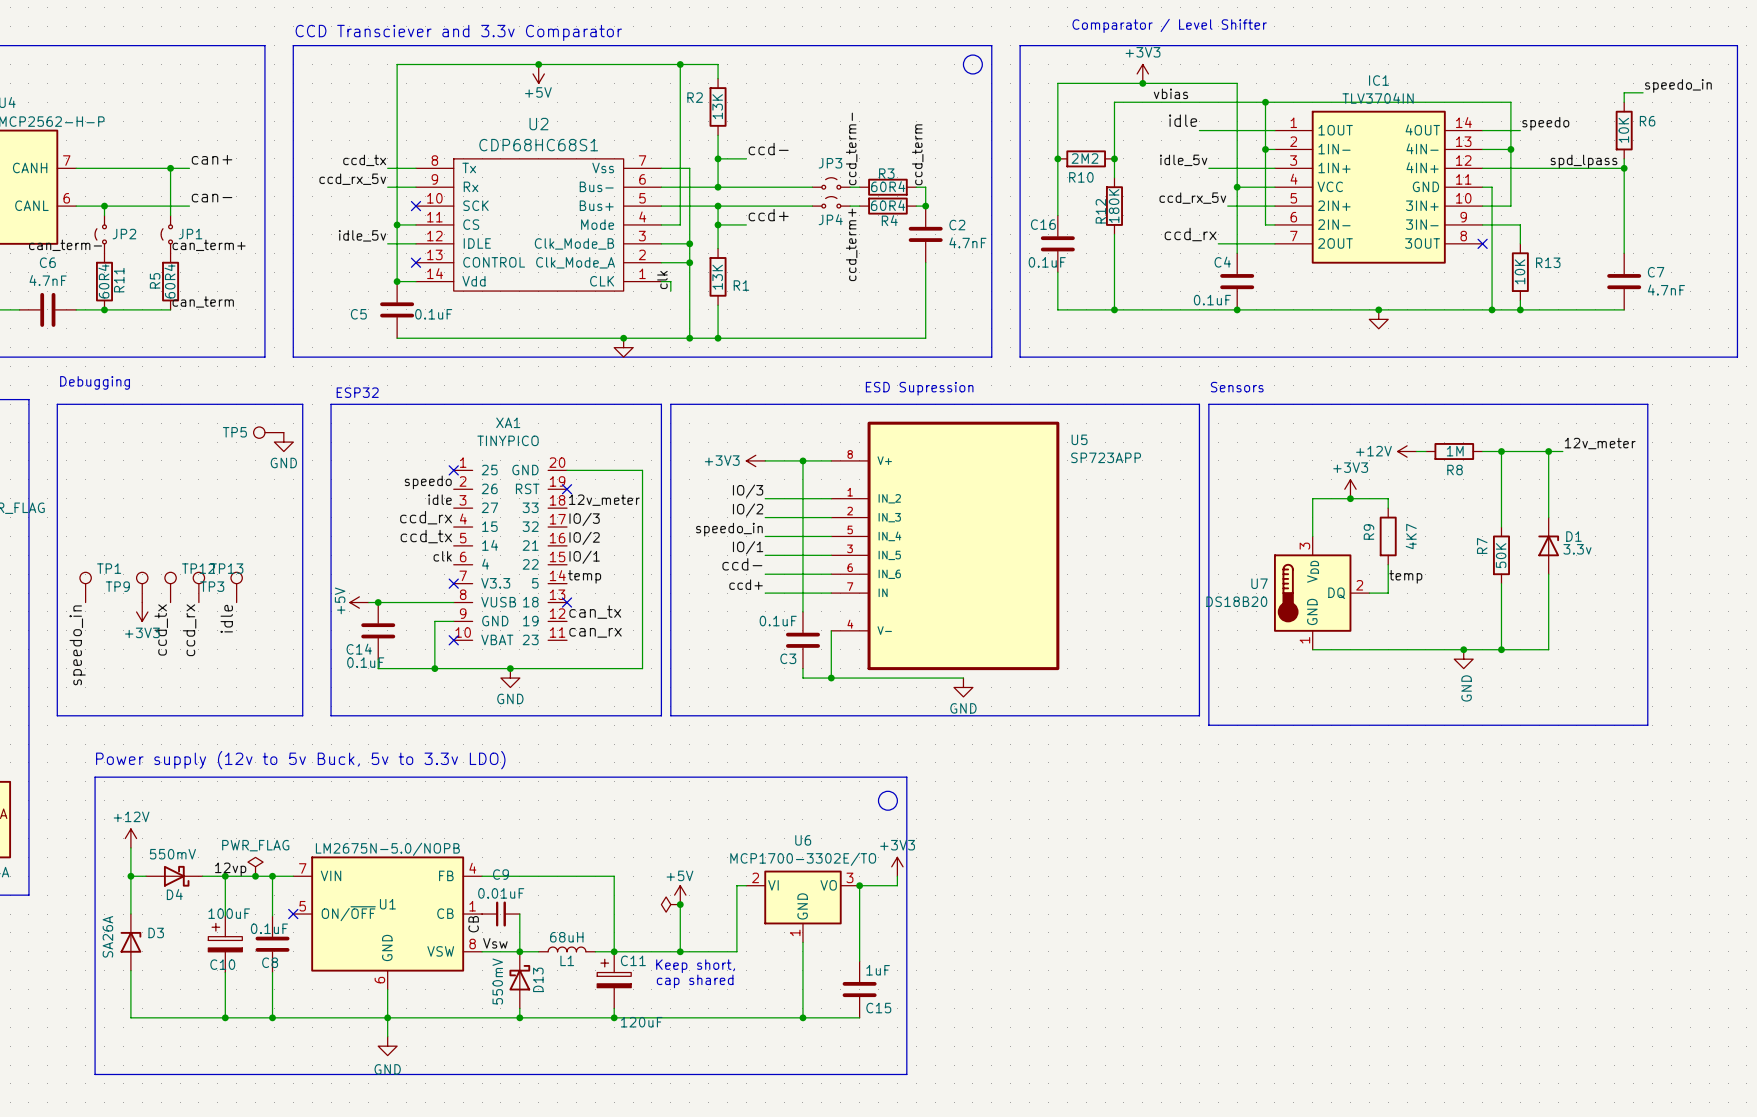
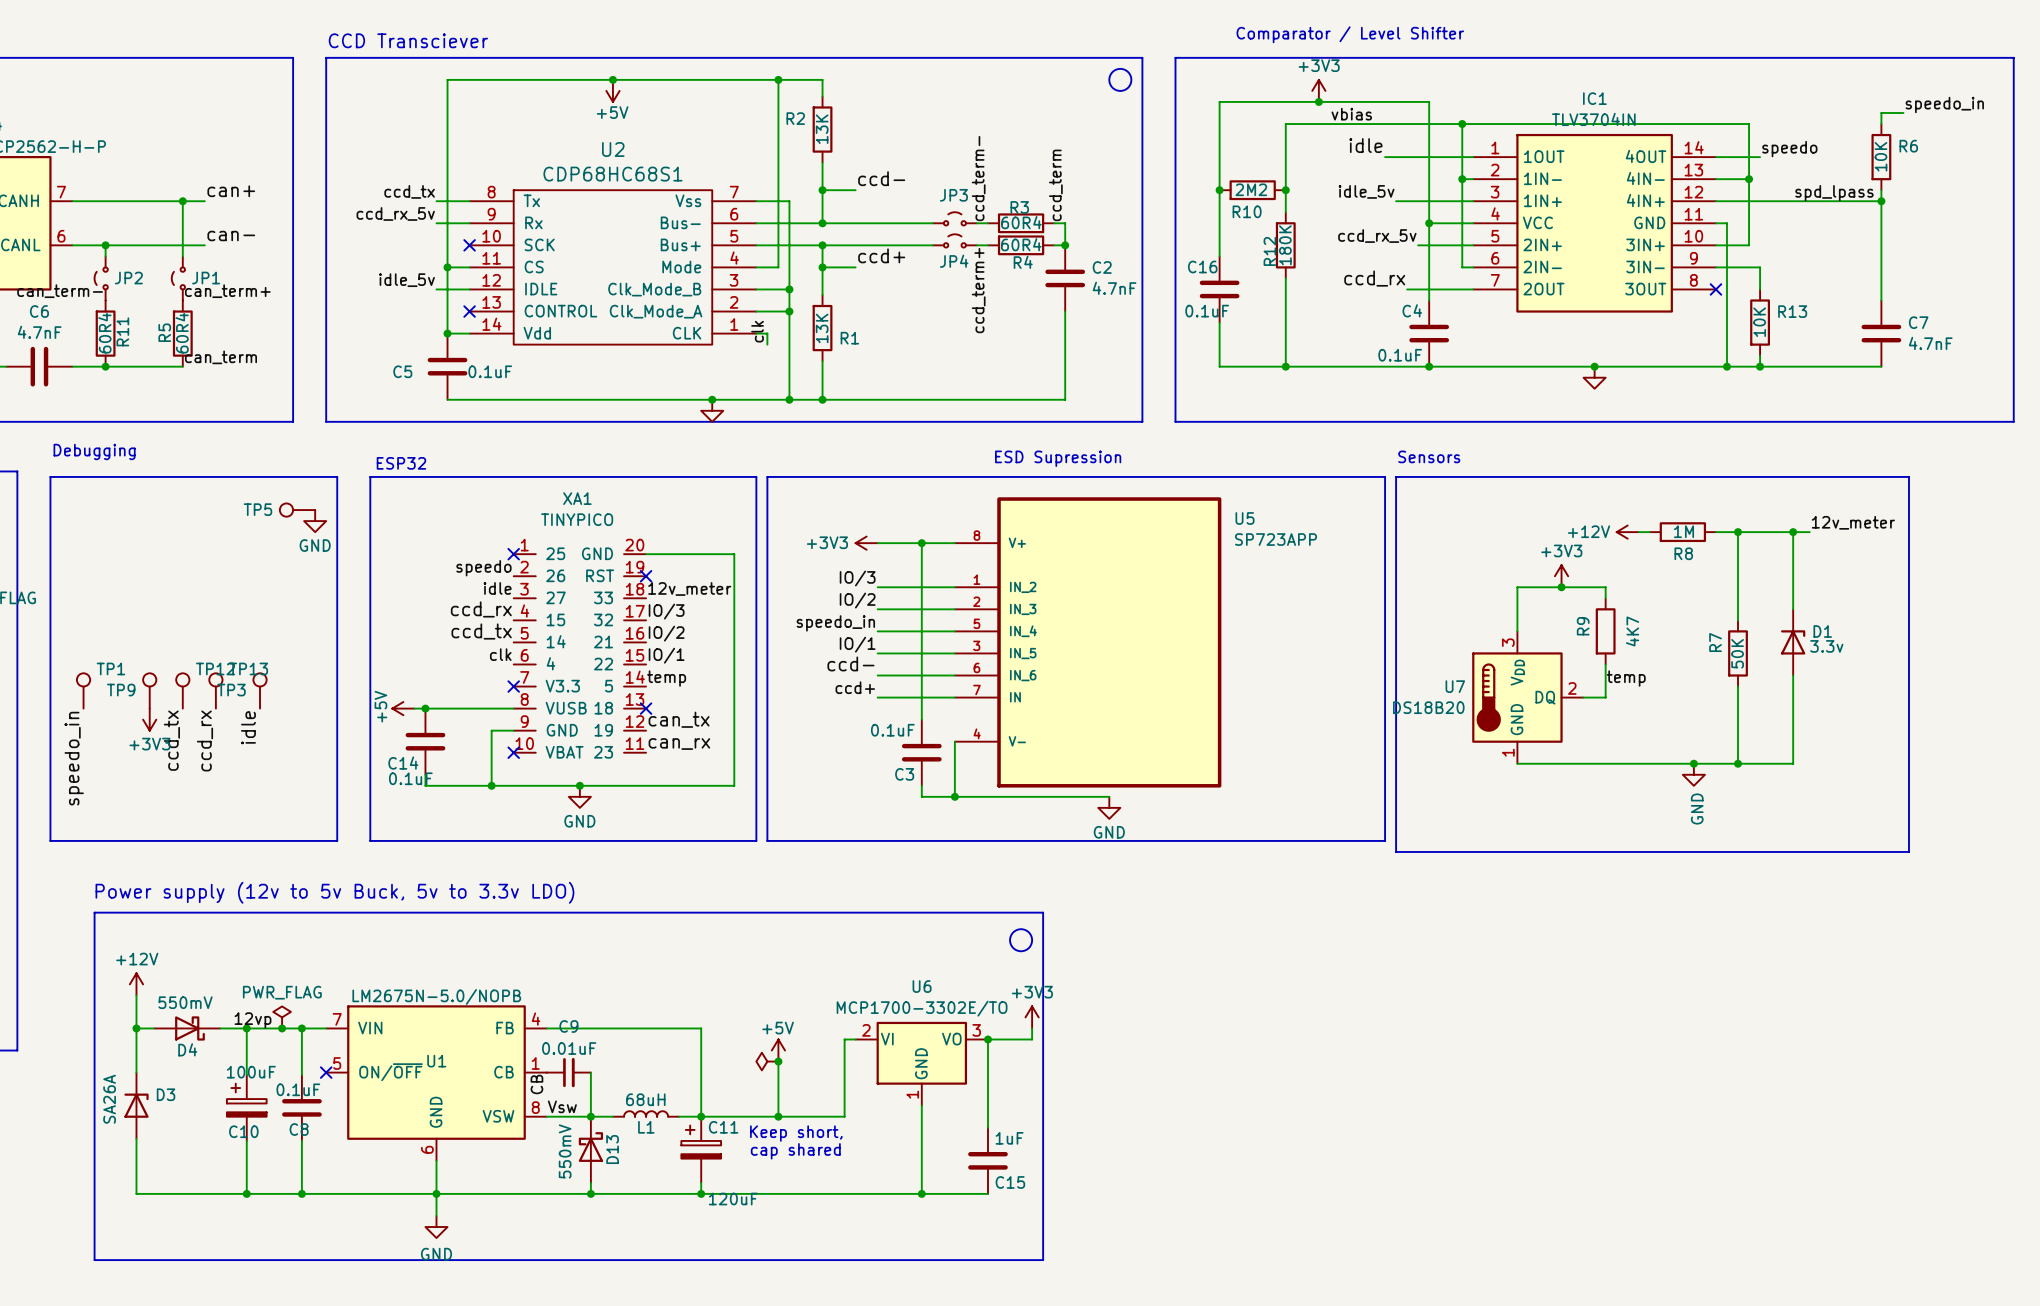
text: CCD Transciever and 3.3v Comparator (458, 32) -> CCD Transciever (408, 40)

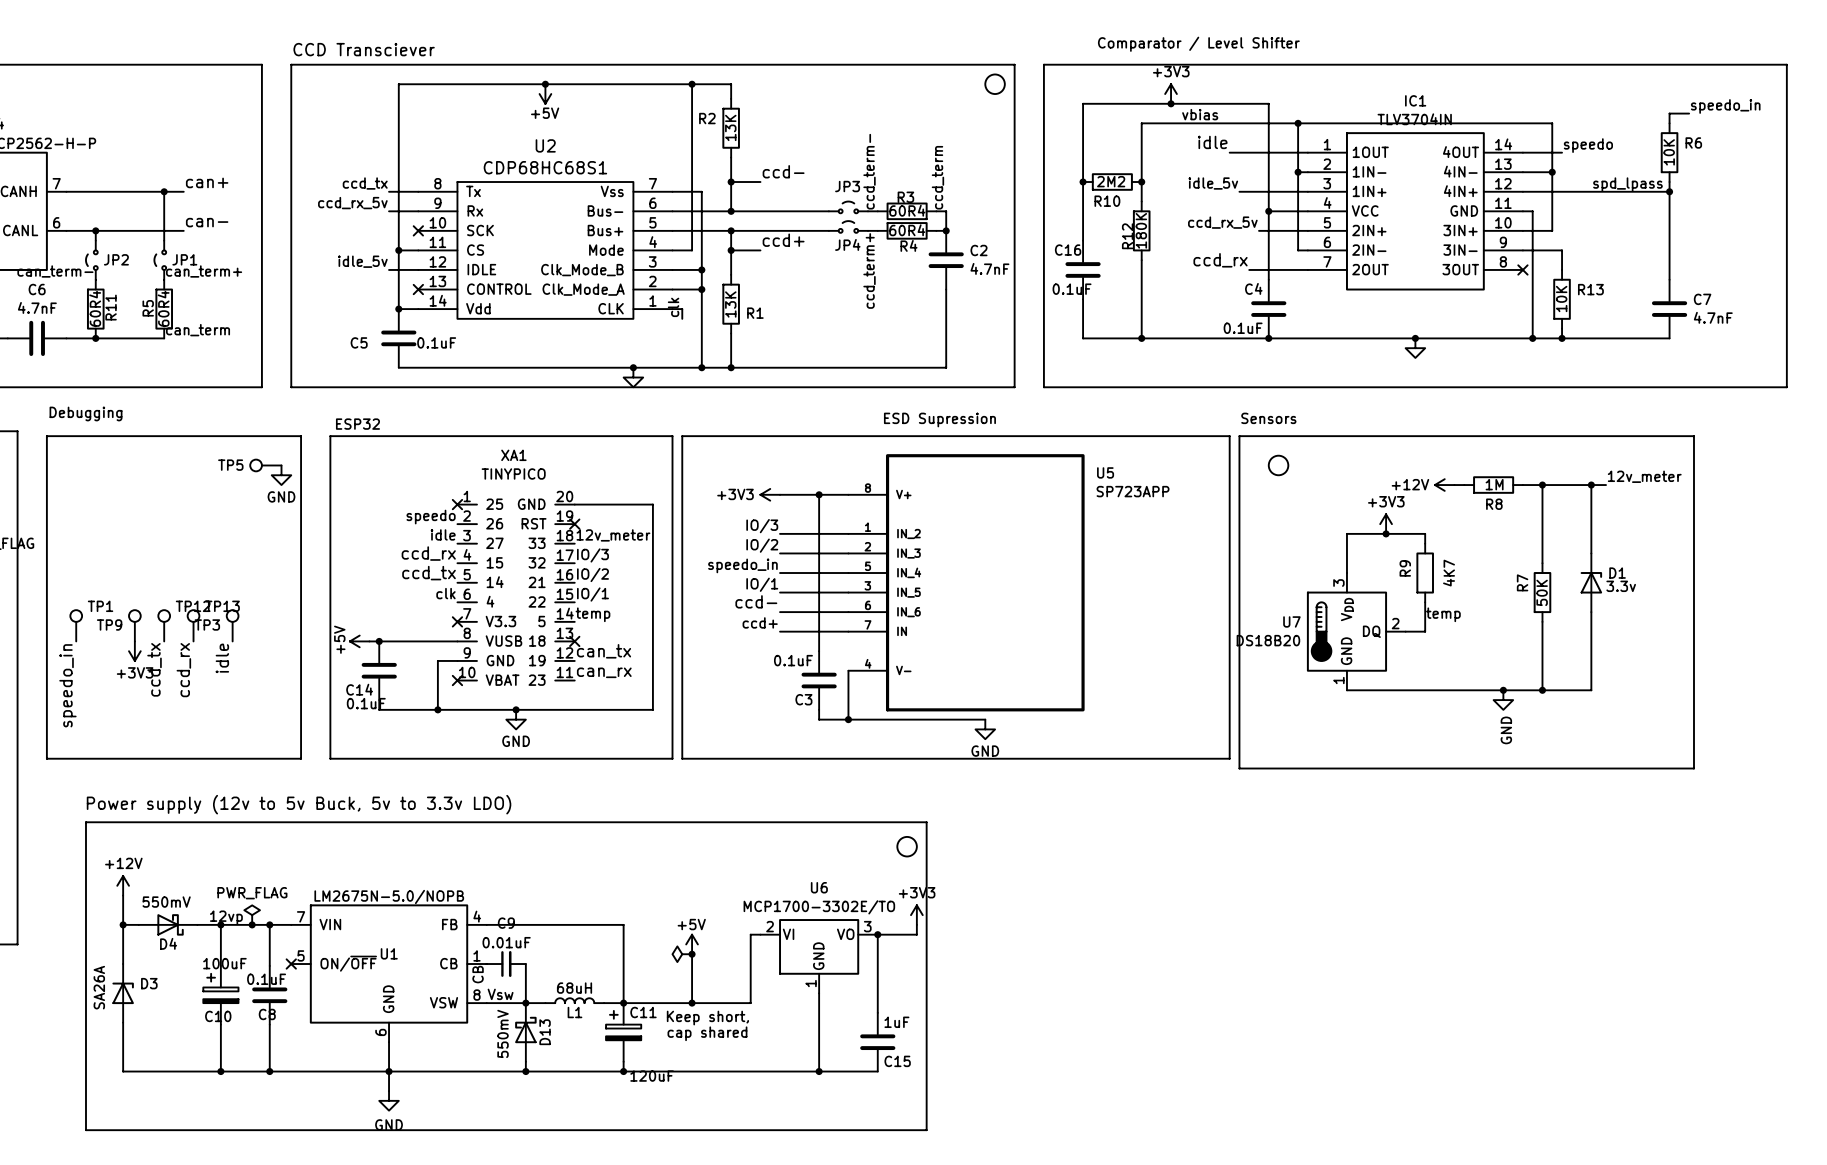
drawing: none -> [1268, 455, 1289, 476]

